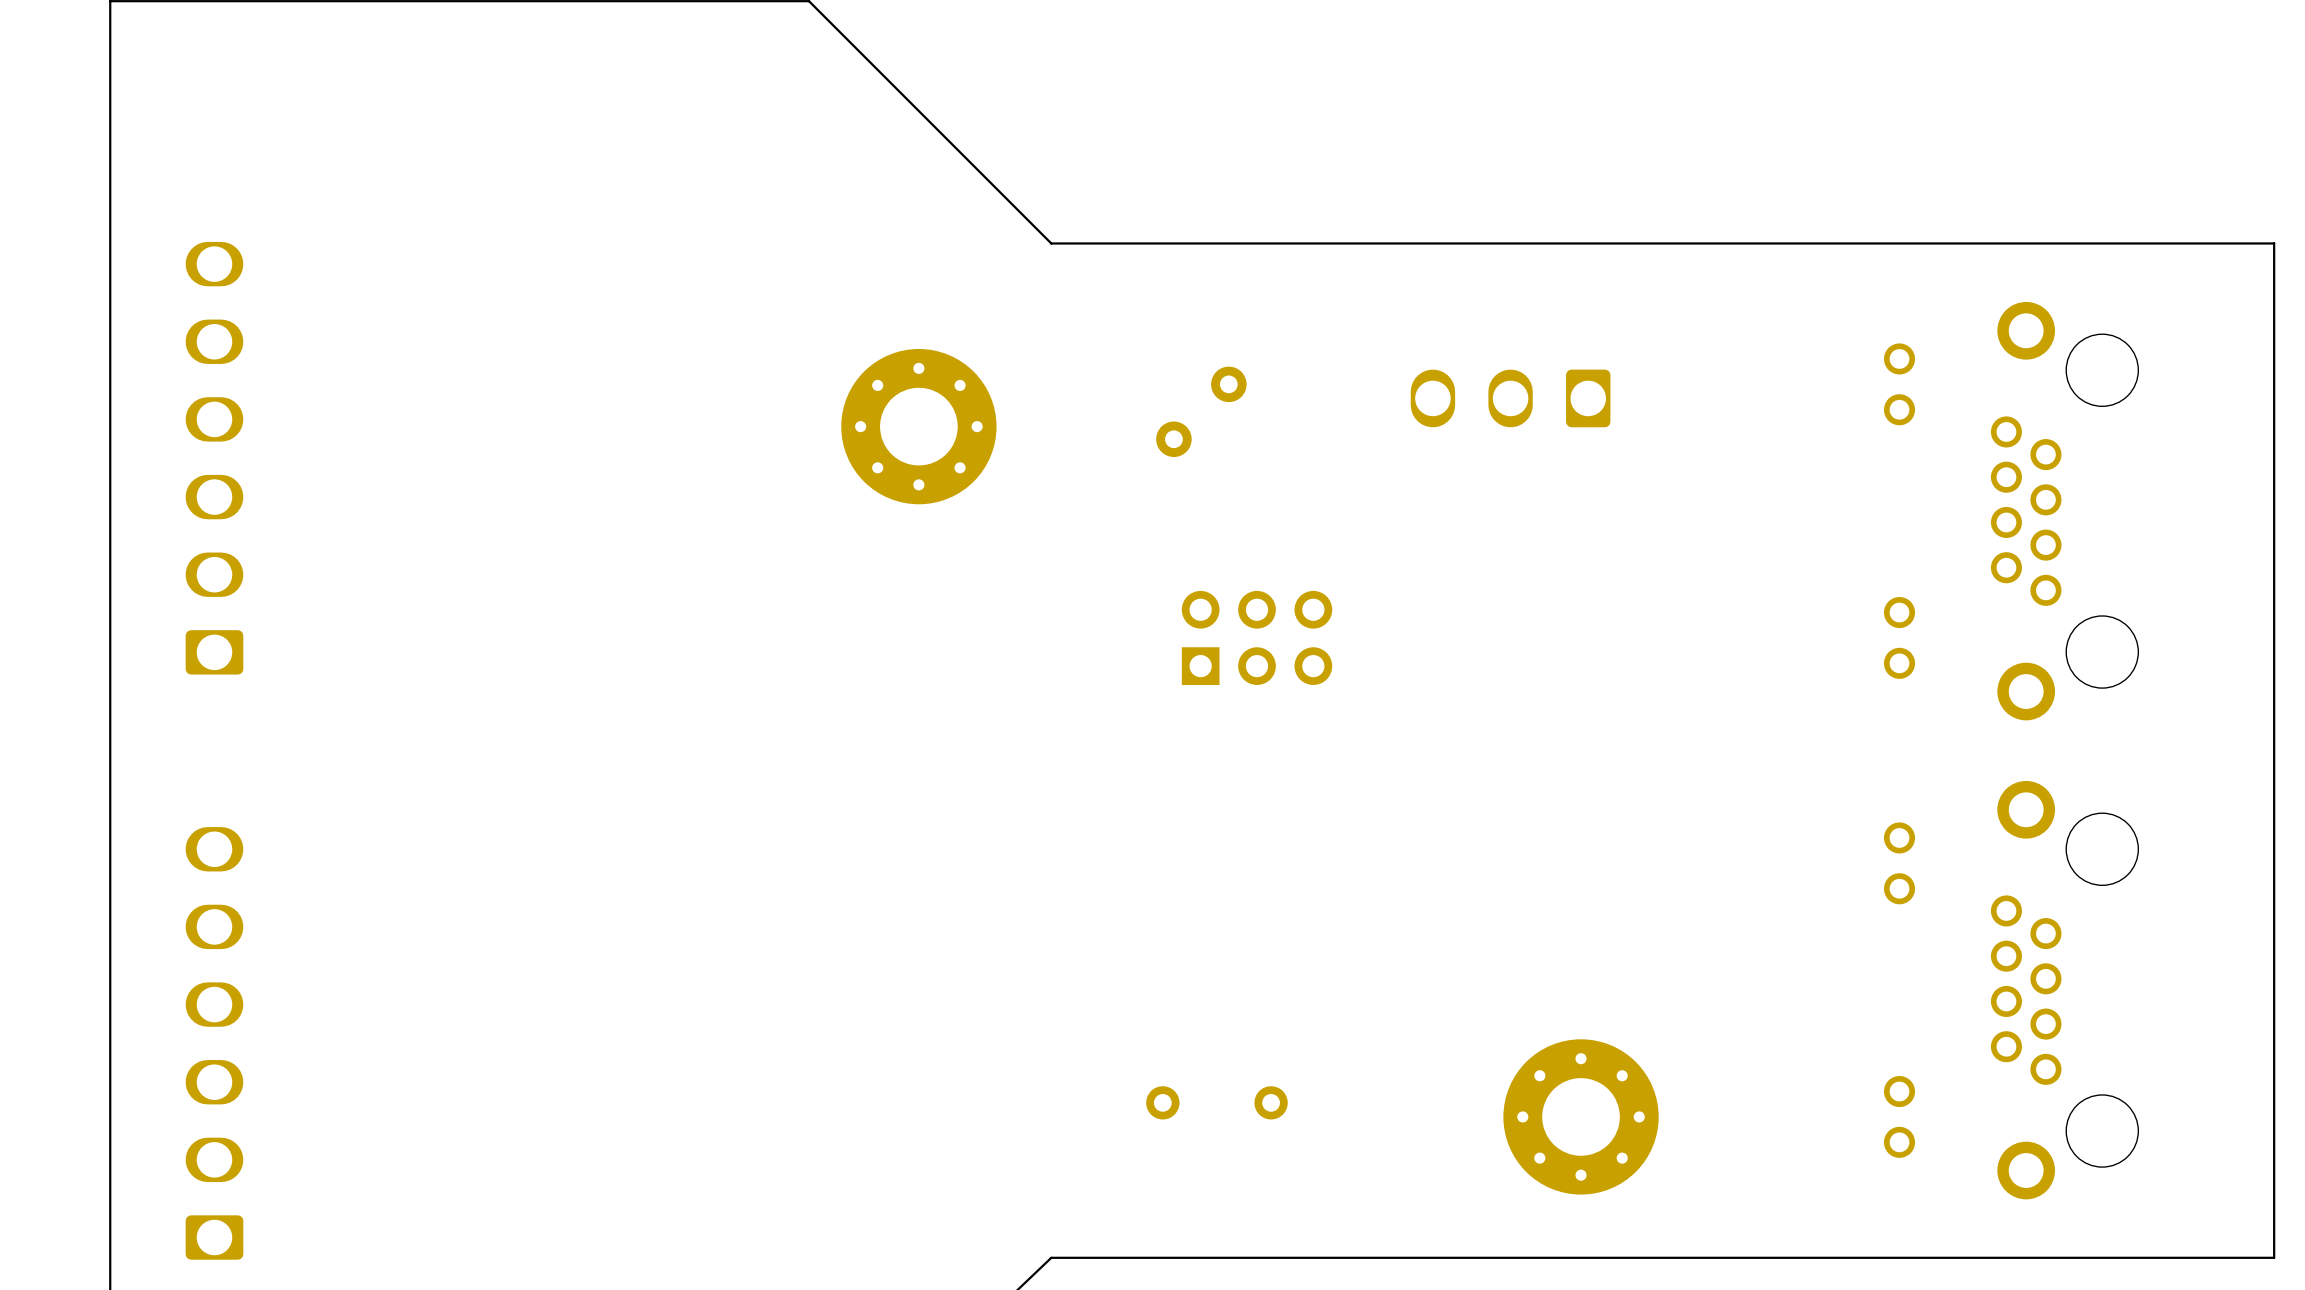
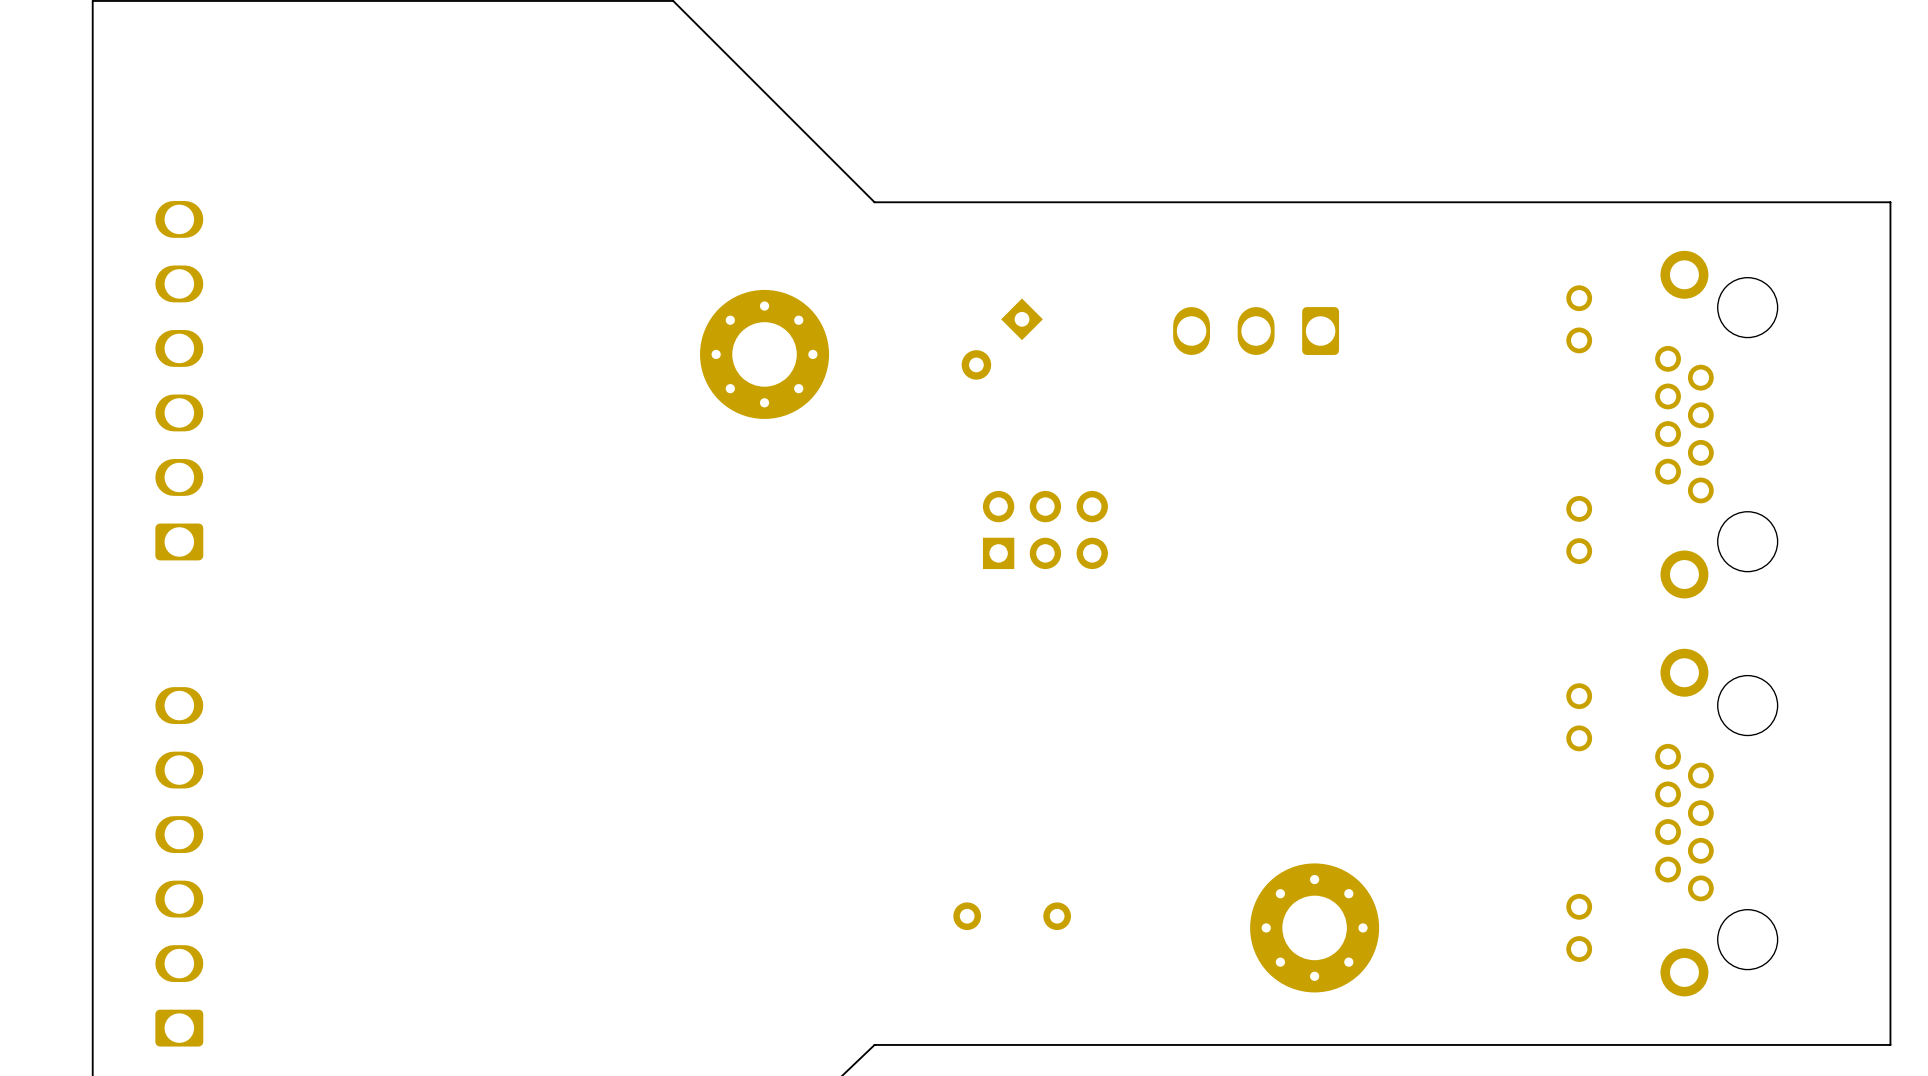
part footprint: [1156, 366, 1247, 458] -> [961, 298, 1043, 380]

